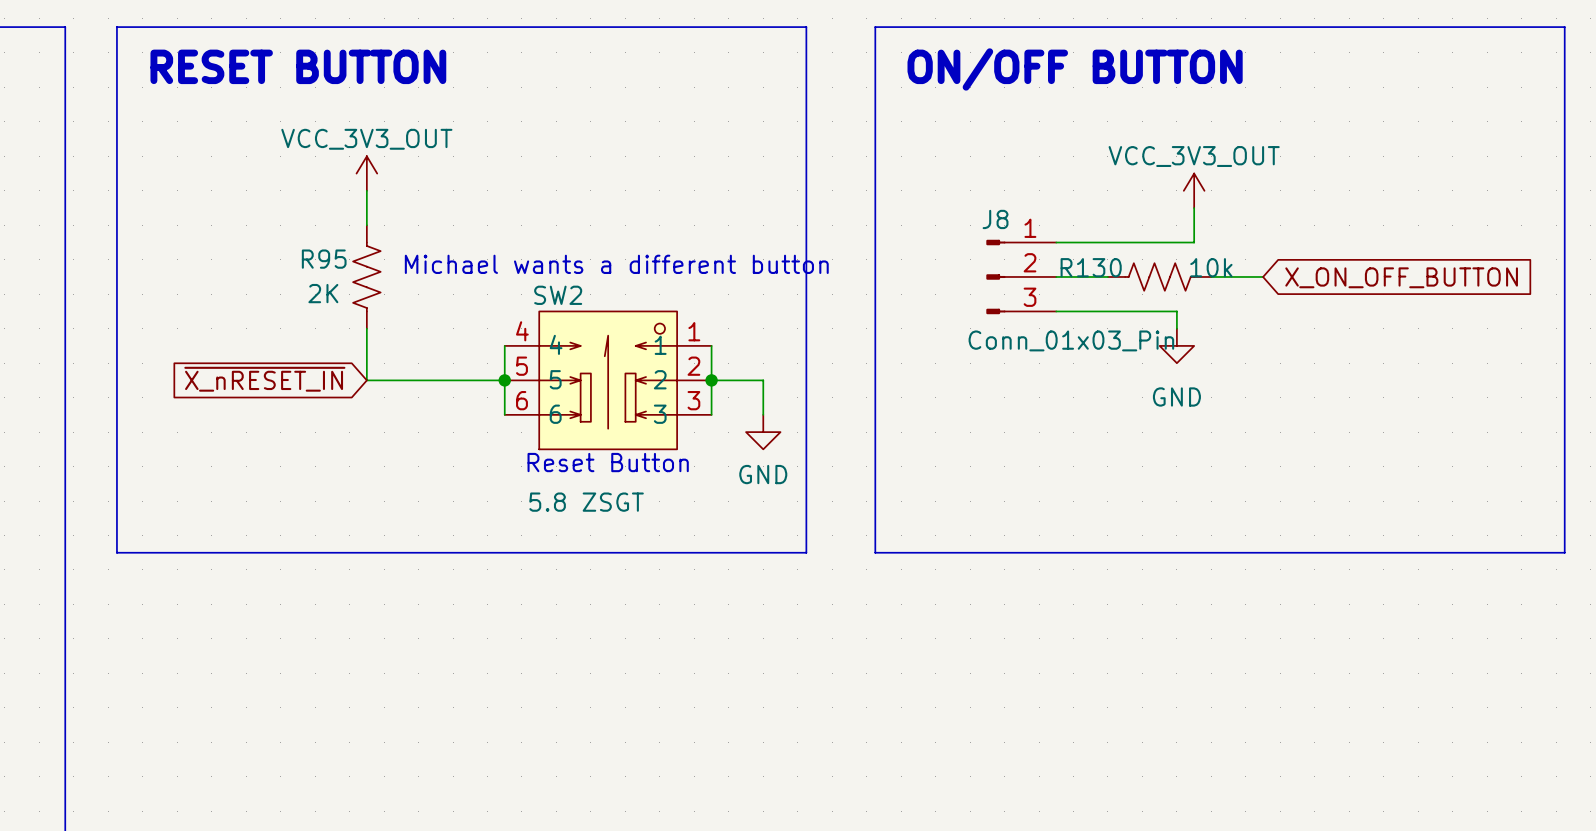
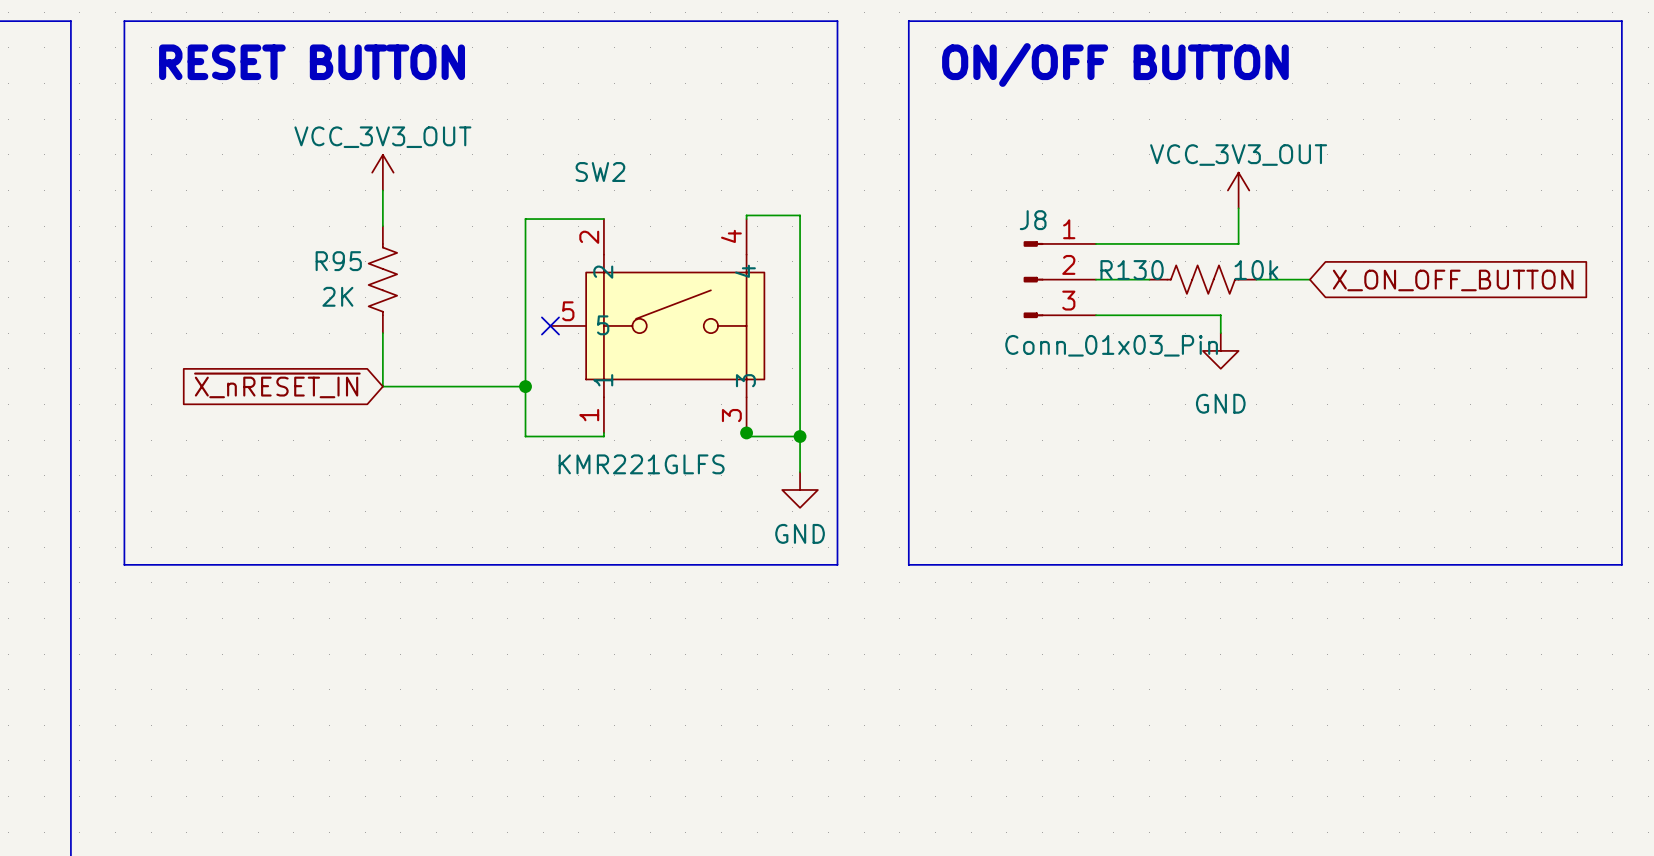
wire: none -> (603, 219) (525, 219) (525, 350)
wire: none -> (746, 219) (746, 215) (800, 215) (800, 472)
text: Michael wants a different button (616, 264) -> none
SW2 name position: SW2 (558, 295) -> SW2 (600, 172)
SW2 symbol: [504, 311, 712, 450] -> [550, 219, 765, 433]
no-connect mark: none -> (550, 325)
wire: (711, 345) (711, 414) -> none
wire: (711, 380) (763, 380) (763, 414) -> none
junction: (711, 380) -> none
wire: none -> (525, 422) (525, 436) (603, 436) (603, 432)
wire: none -> (746, 429) (746, 436) (800, 436)
junction: none -> (746, 432)
junction: none -> (800, 436)
power symbol position: GND (763, 432) -> GND (800, 489)
text: Reset Button (608, 462) -> none
SW2 value: 5.8 ZSGT (586, 502) -> KMR221GLFS (641, 464)

